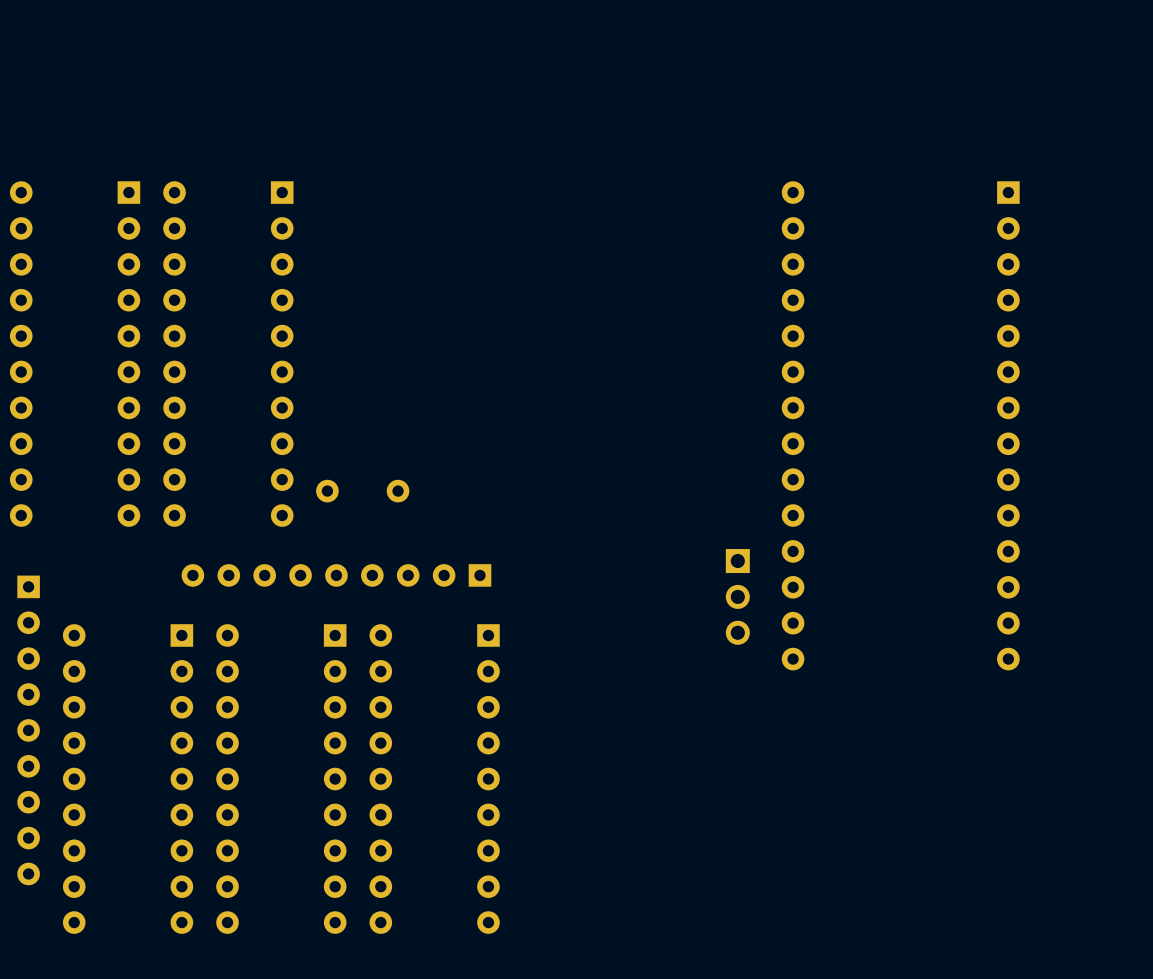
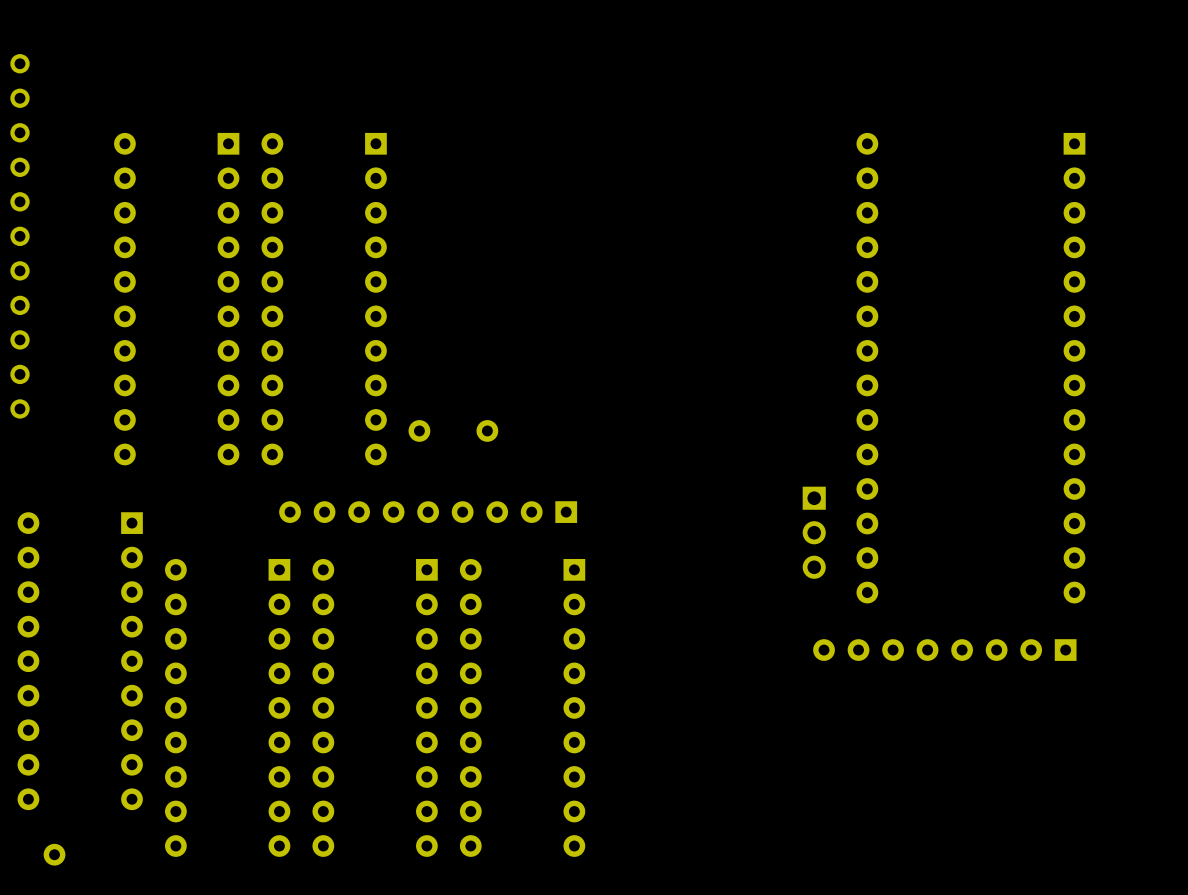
part: none -> (944, 650)

